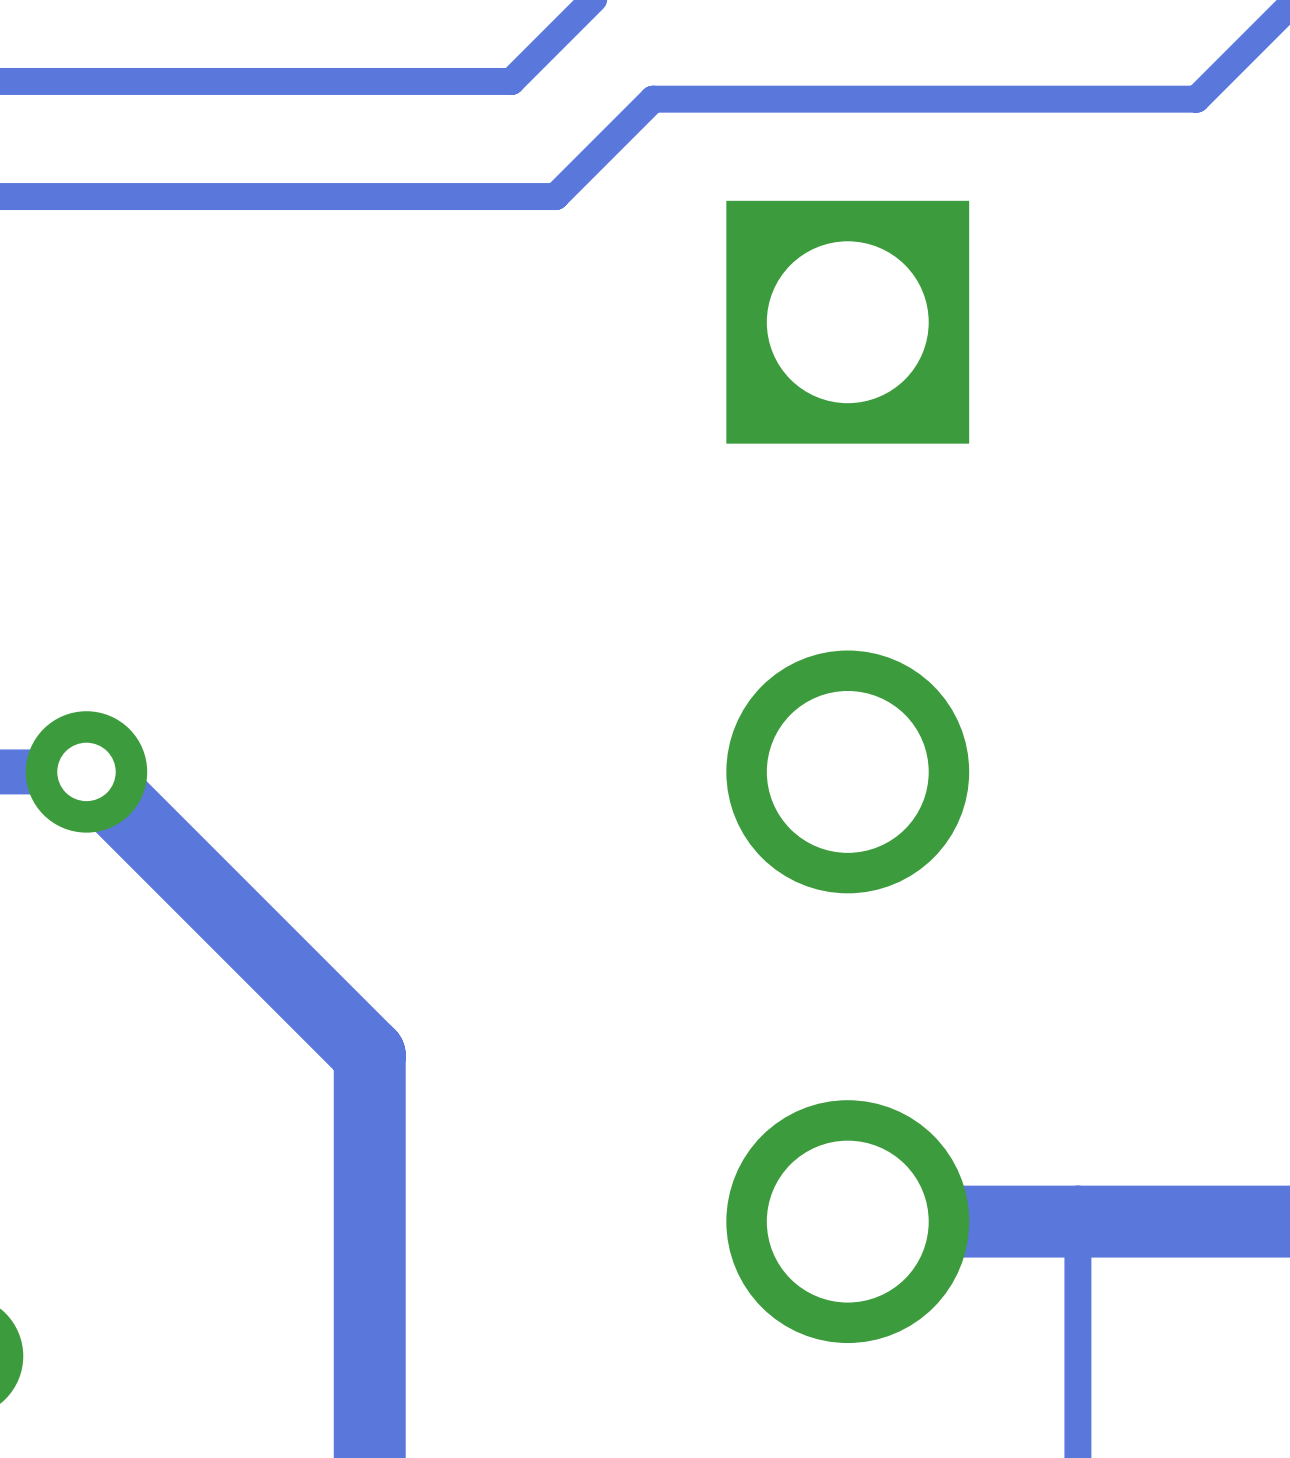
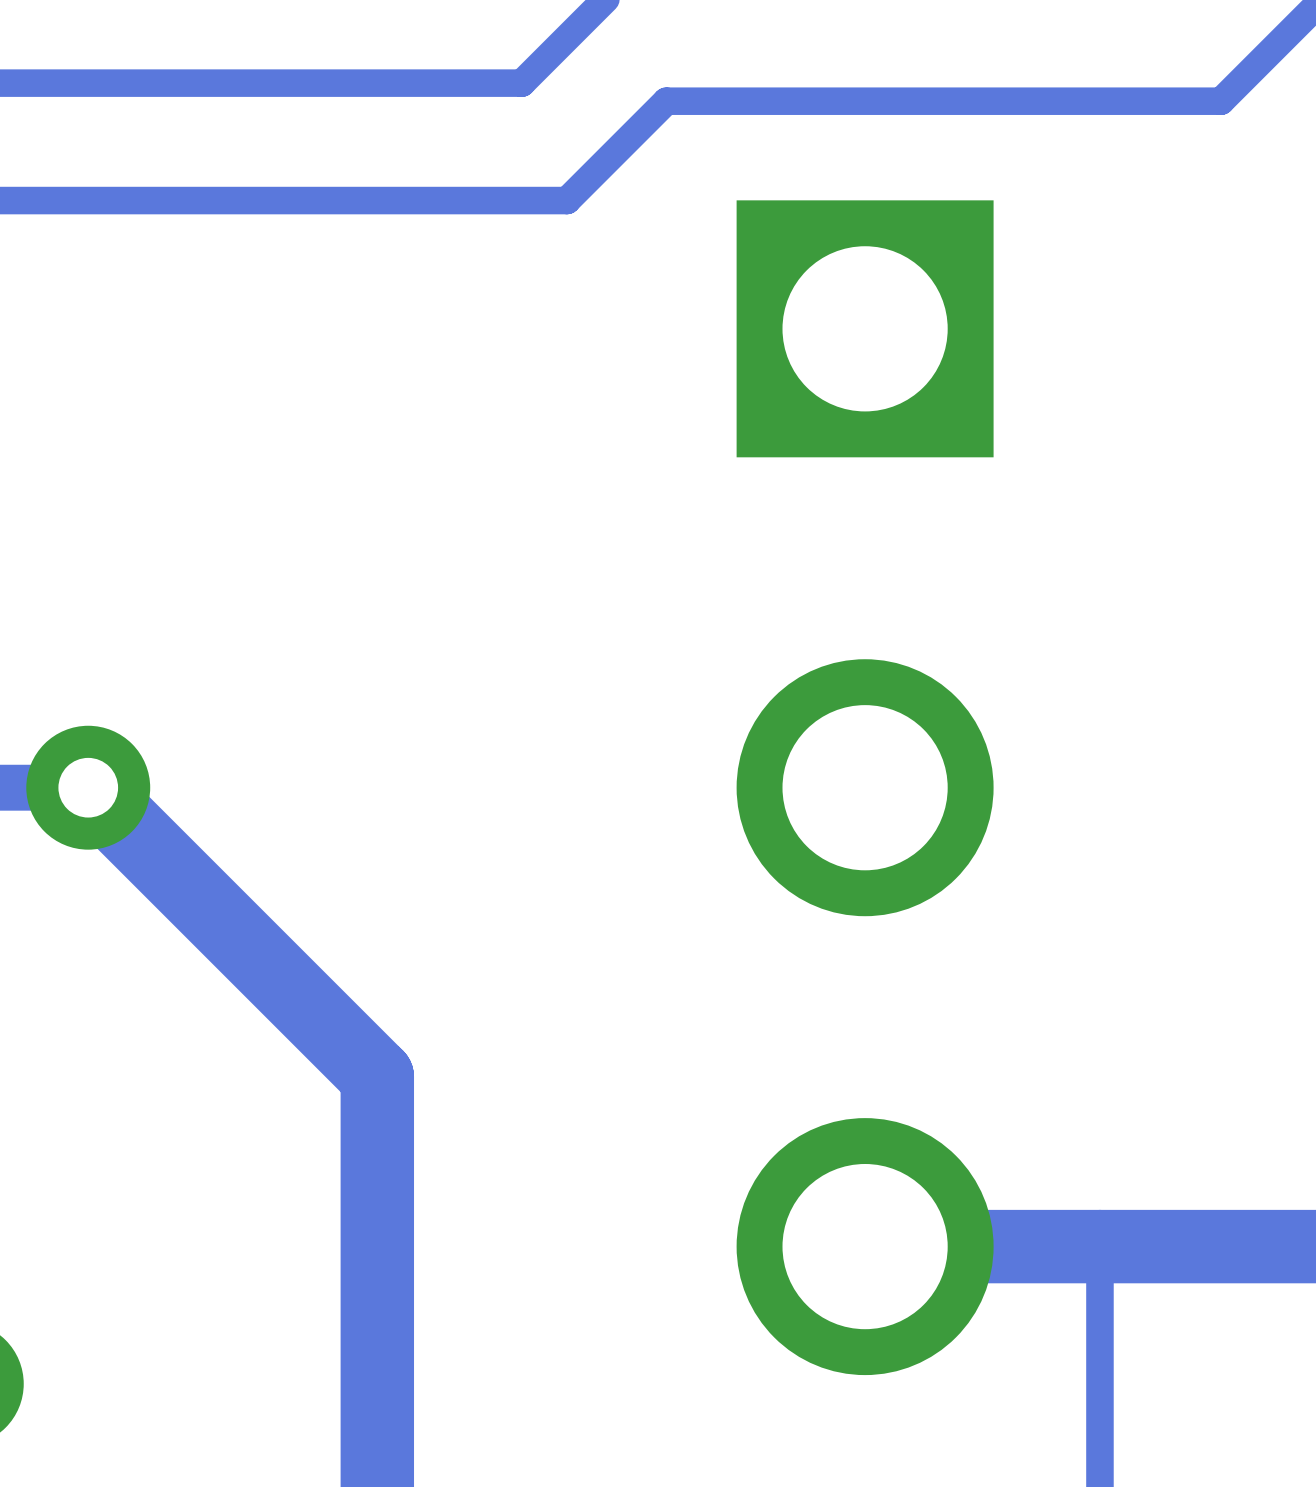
part footprint: [726, 200, 970, 1344] -> [736, 200, 994, 1376]

